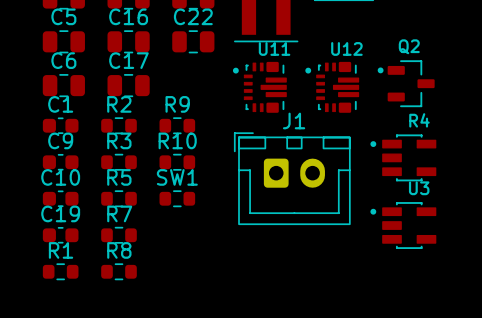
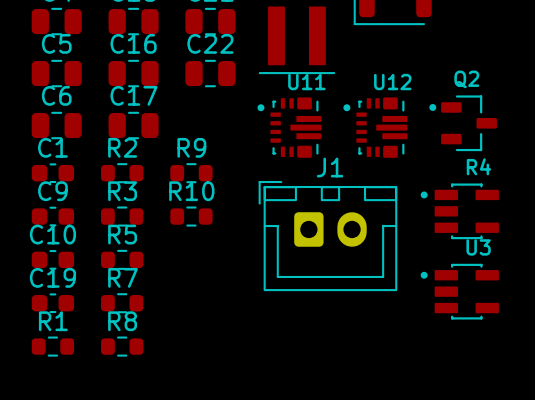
SW1: (177, 198) -> none

